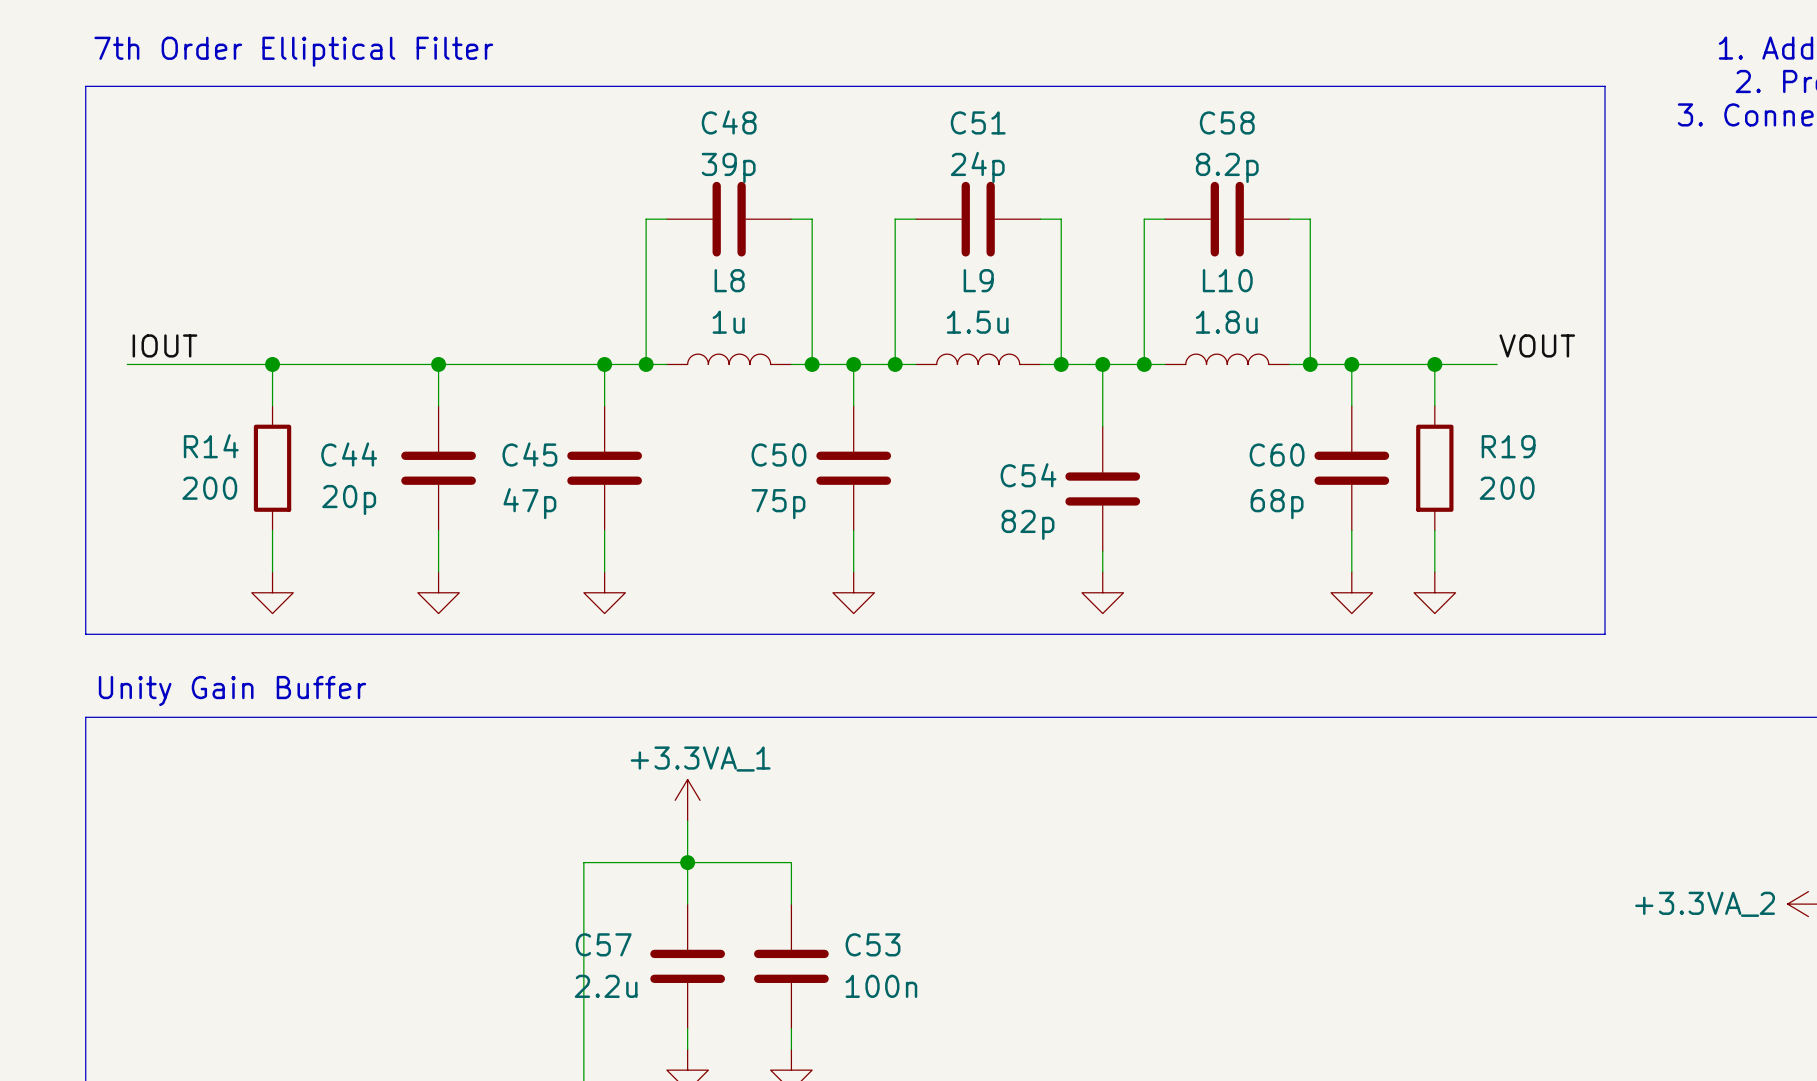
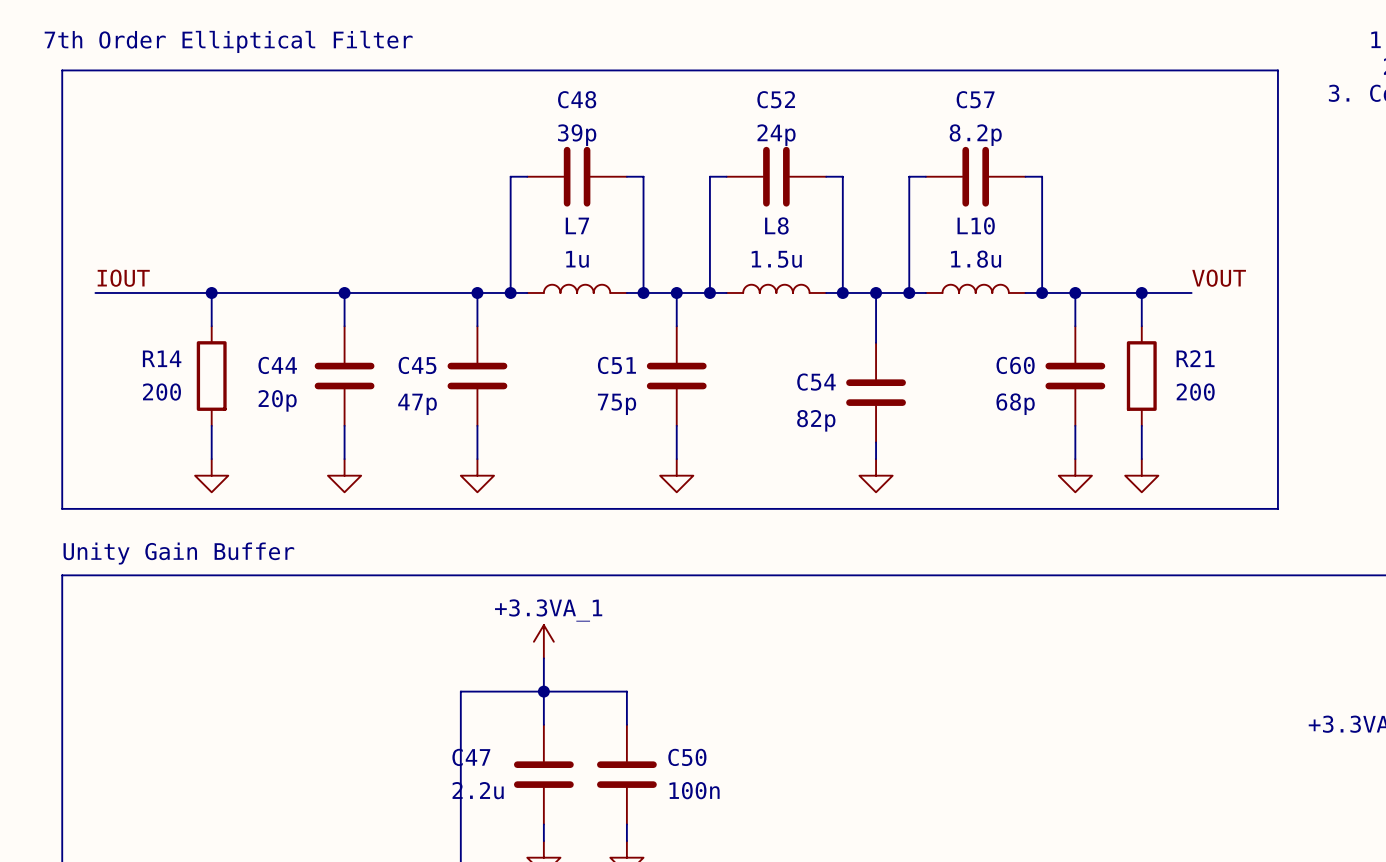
C51 name: C51 (978, 122) -> C52 (776, 99)
C58 name: C58 (1227, 122) -> C57 (975, 99)
L8 name: L8 (729, 280) -> L7 (577, 225)
L9 name: L9 (978, 280) -> L8 (776, 225)
R19 name: R19 (1508, 446) -> R21 (1195, 358)
C50 name: C50 (778, 455) -> C51 (616, 365)
C57 name: C57 (603, 944) -> C47 (471, 757)
C53 name: C53 (873, 944) -> C50 (687, 757)

